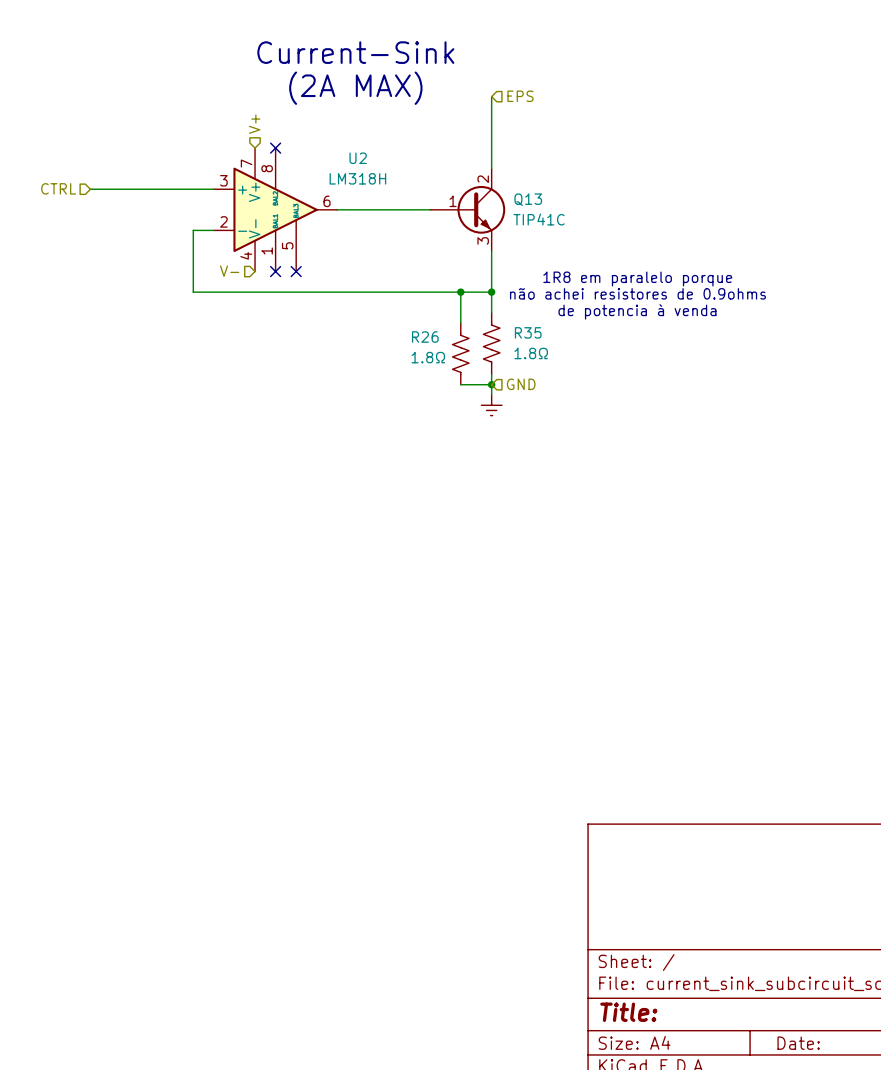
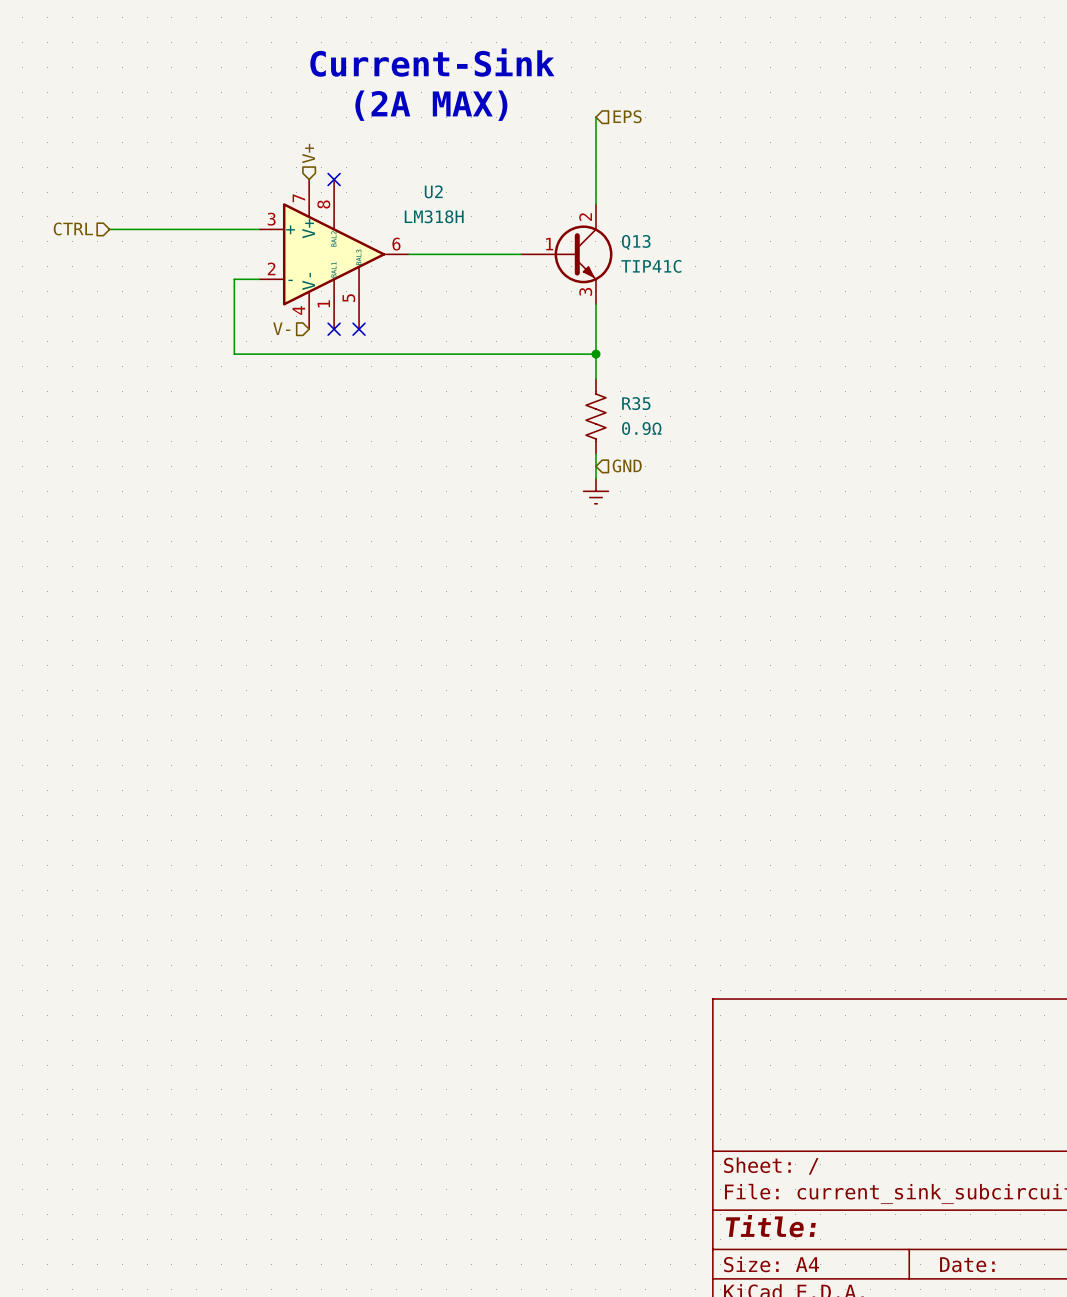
text: 1R8 em paralelo porque (637, 278) -> none
wire: (460, 292) (460, 323) -> none
junction: (460, 292) -> none
text: não achei resistores de 0.9ohms (637, 293) -> none
text: de potencia à venda (637, 311) -> none
R26: 1.8Ω (460, 353) -> none
R35 value: 1.8Ω (531, 353) -> 0.9Ω (641, 428)
wire: (460, 384) (491, 384) -> none
junction: (491, 384) -> none

